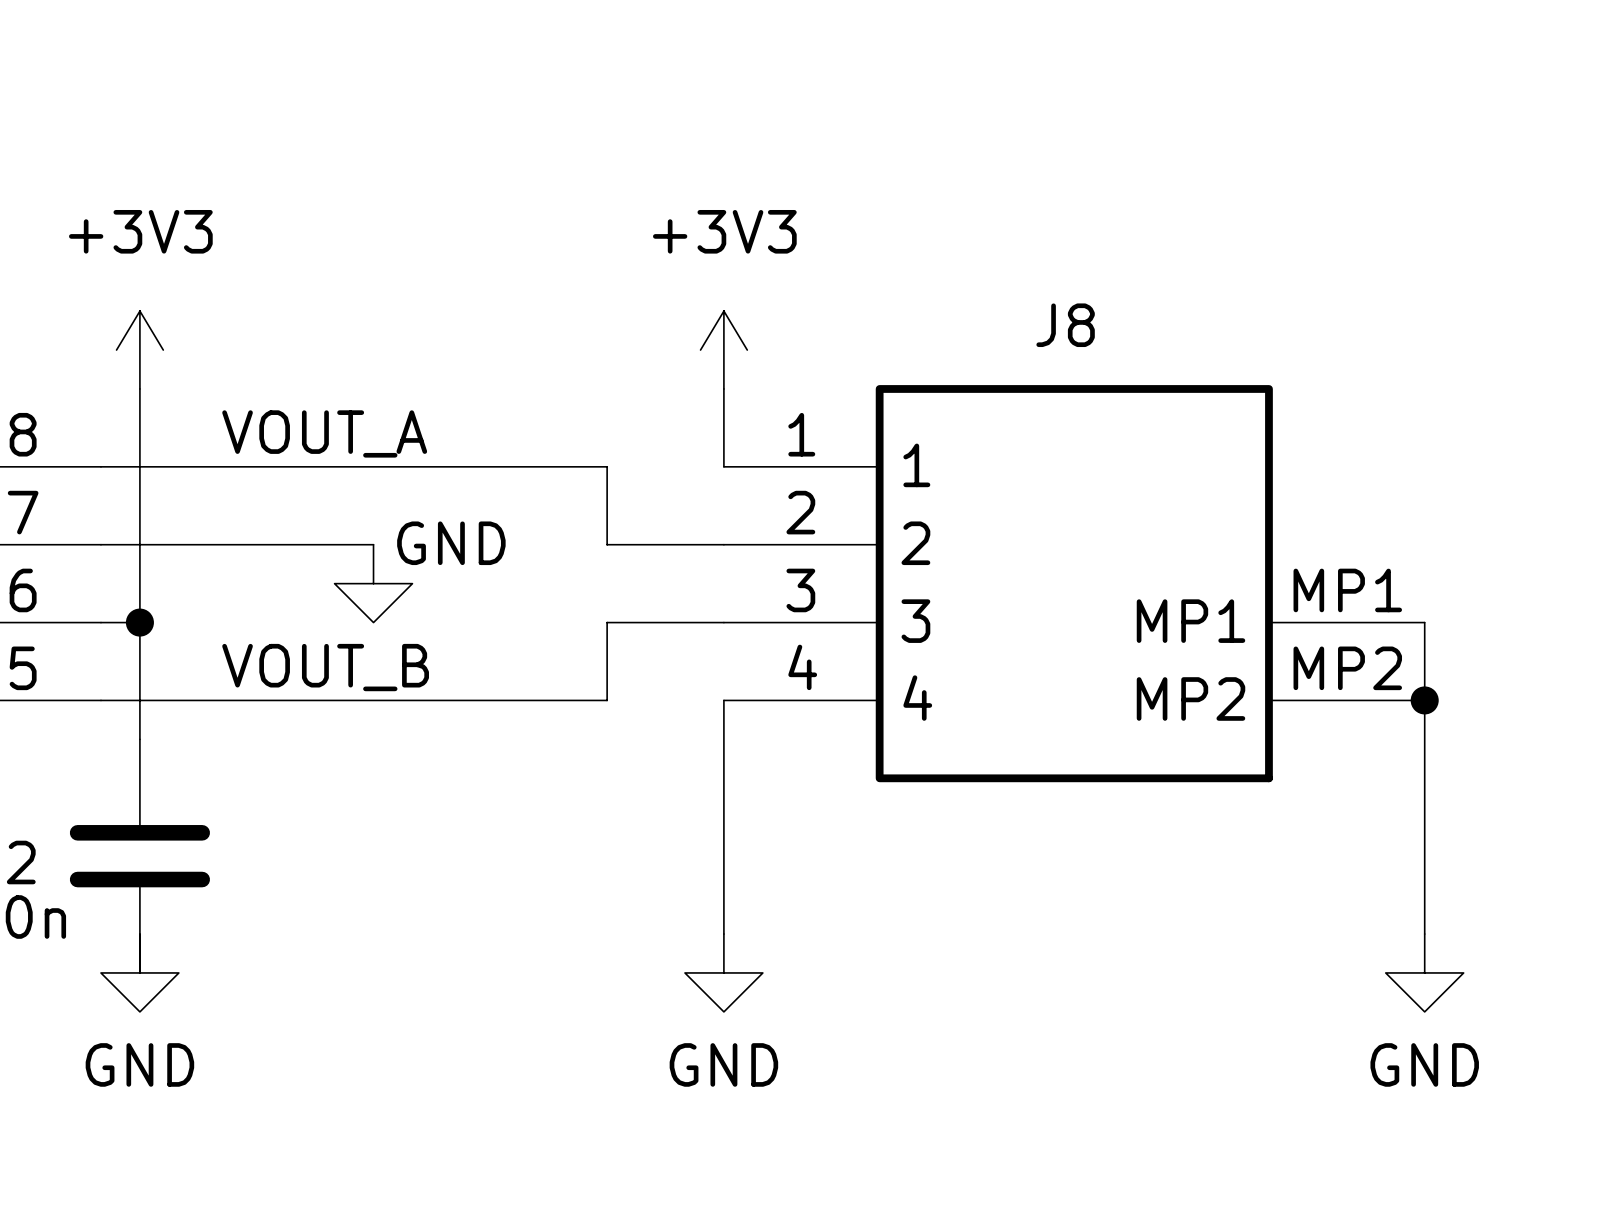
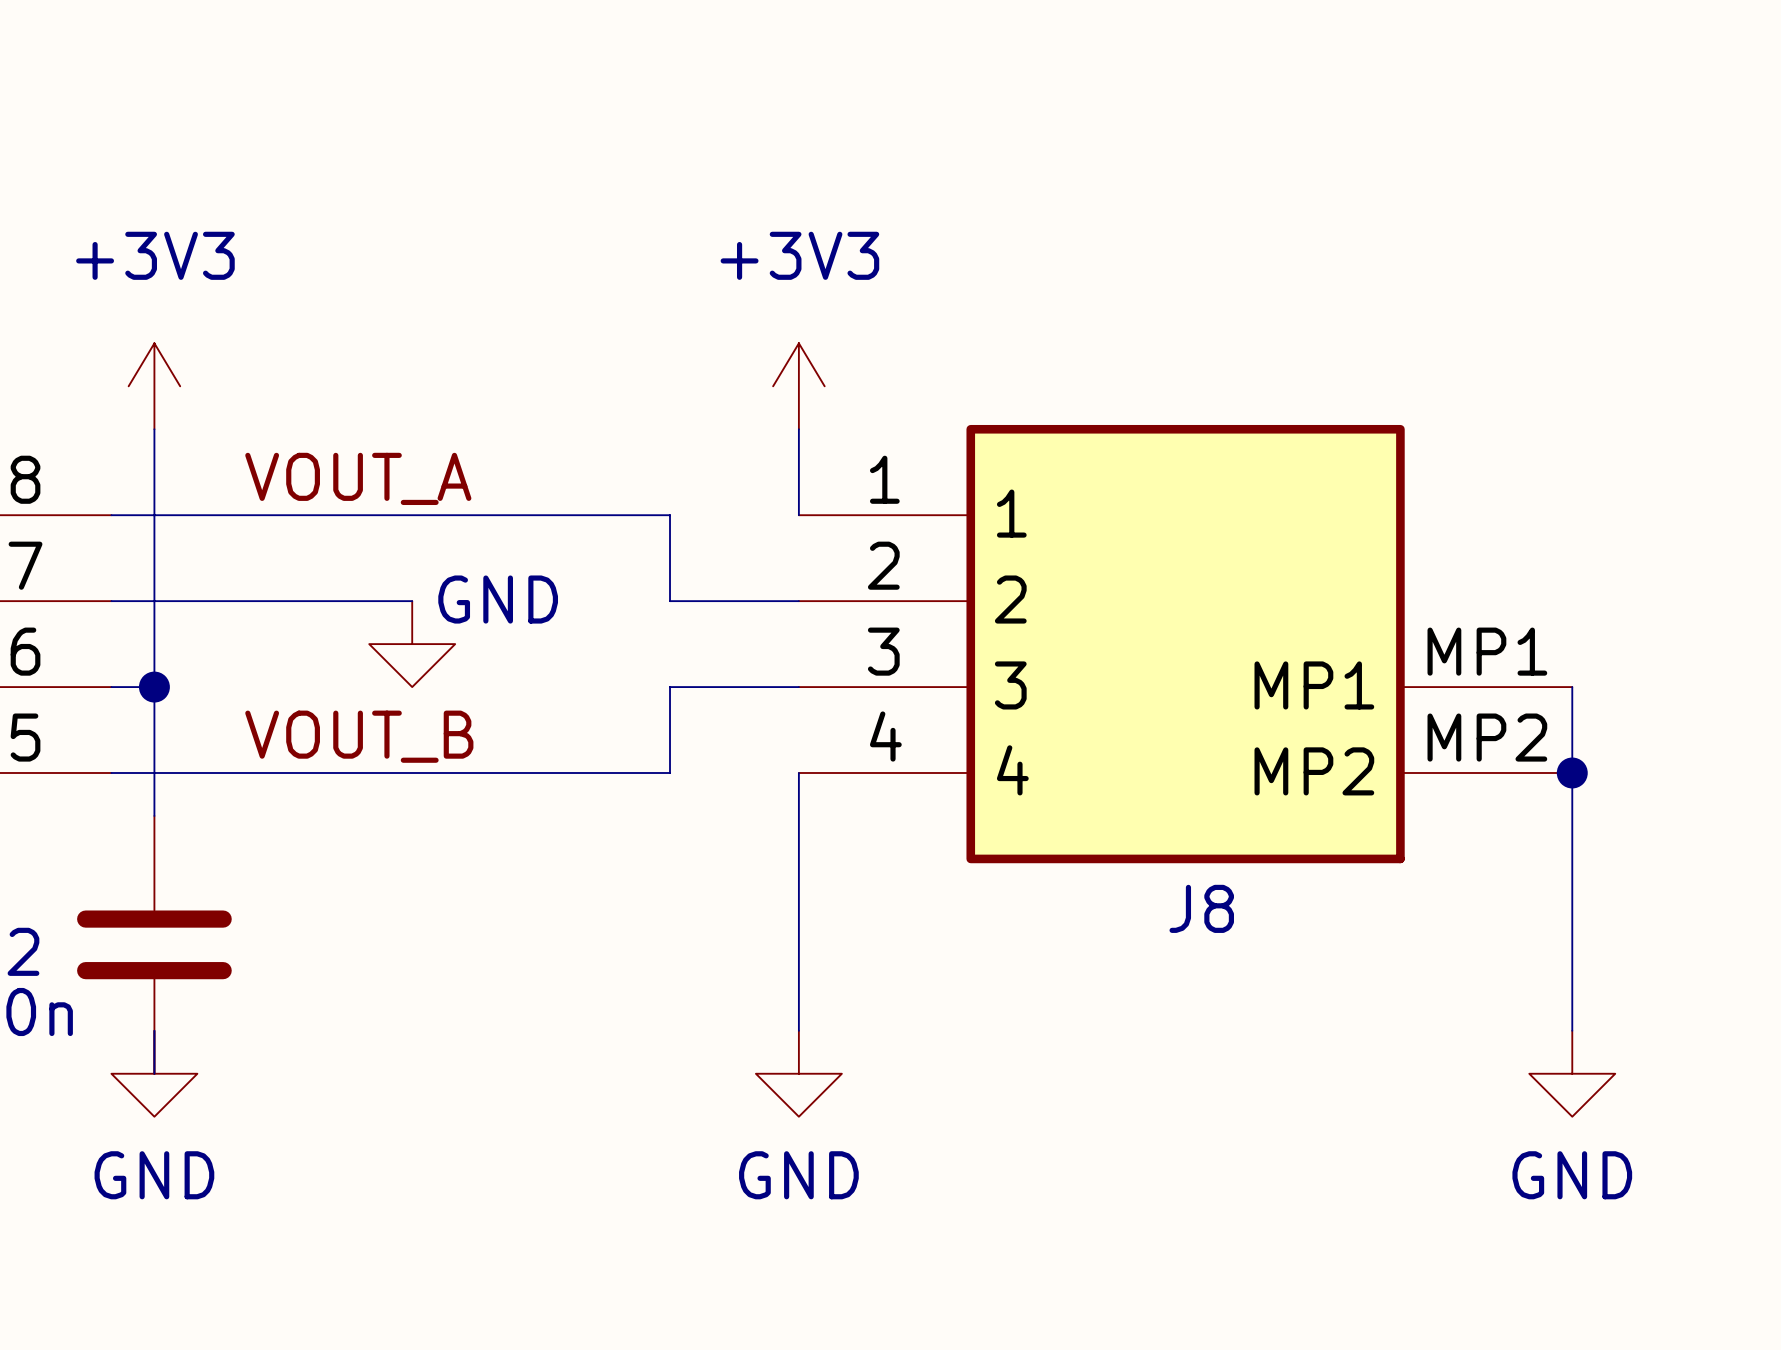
J8 name position: J8 (1065, 325) -> J8 (1201, 908)

